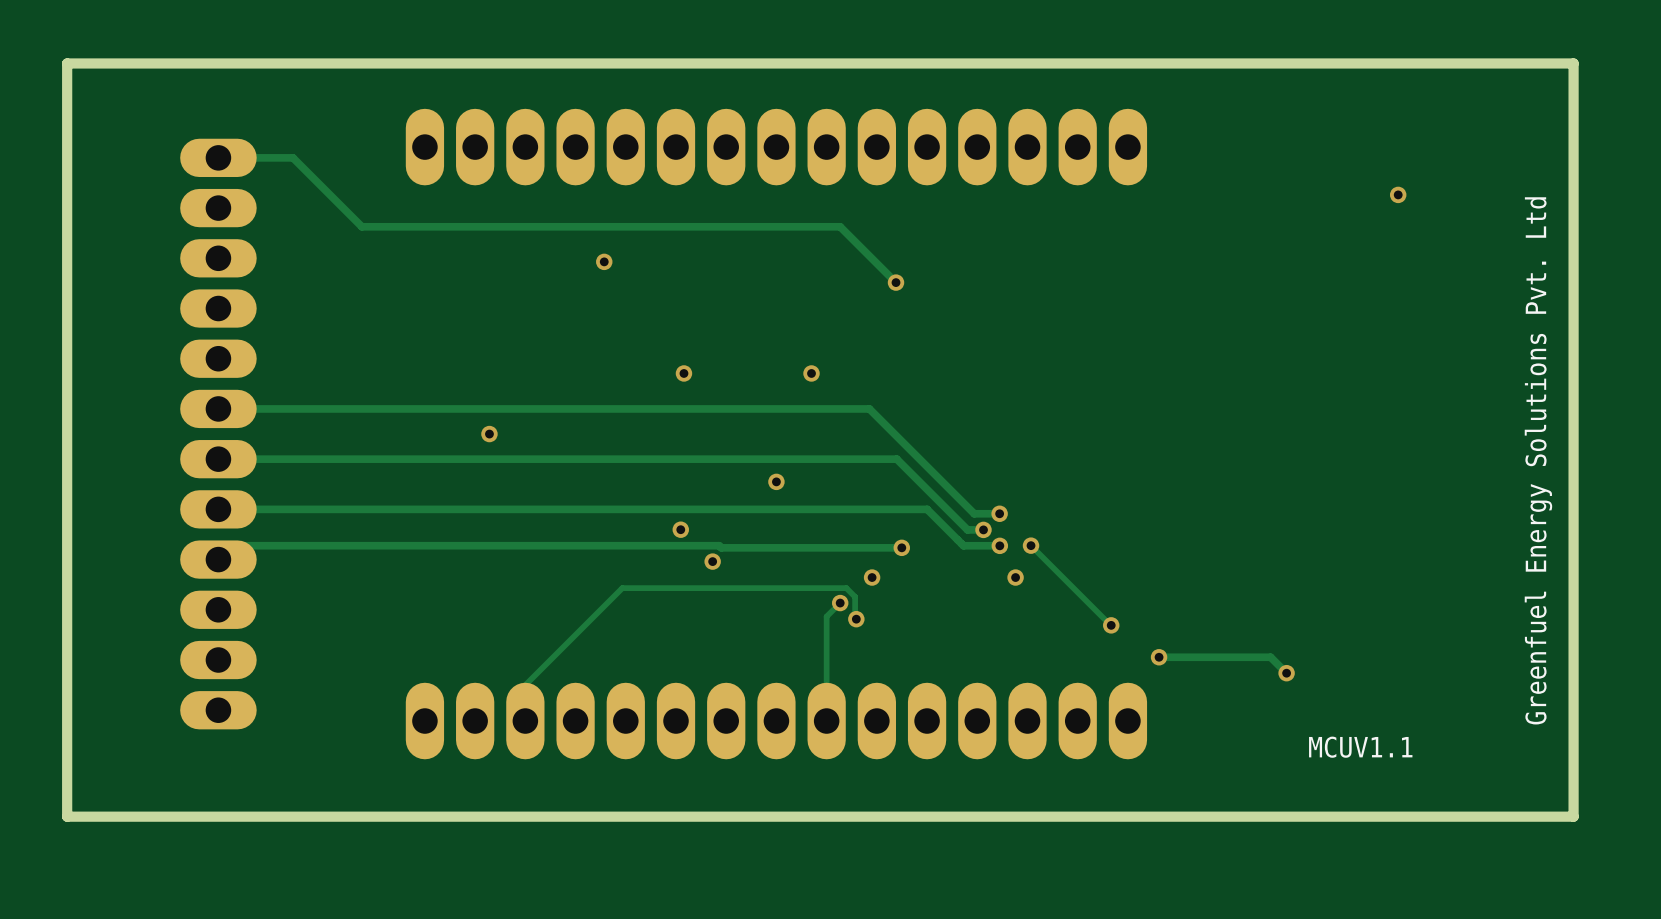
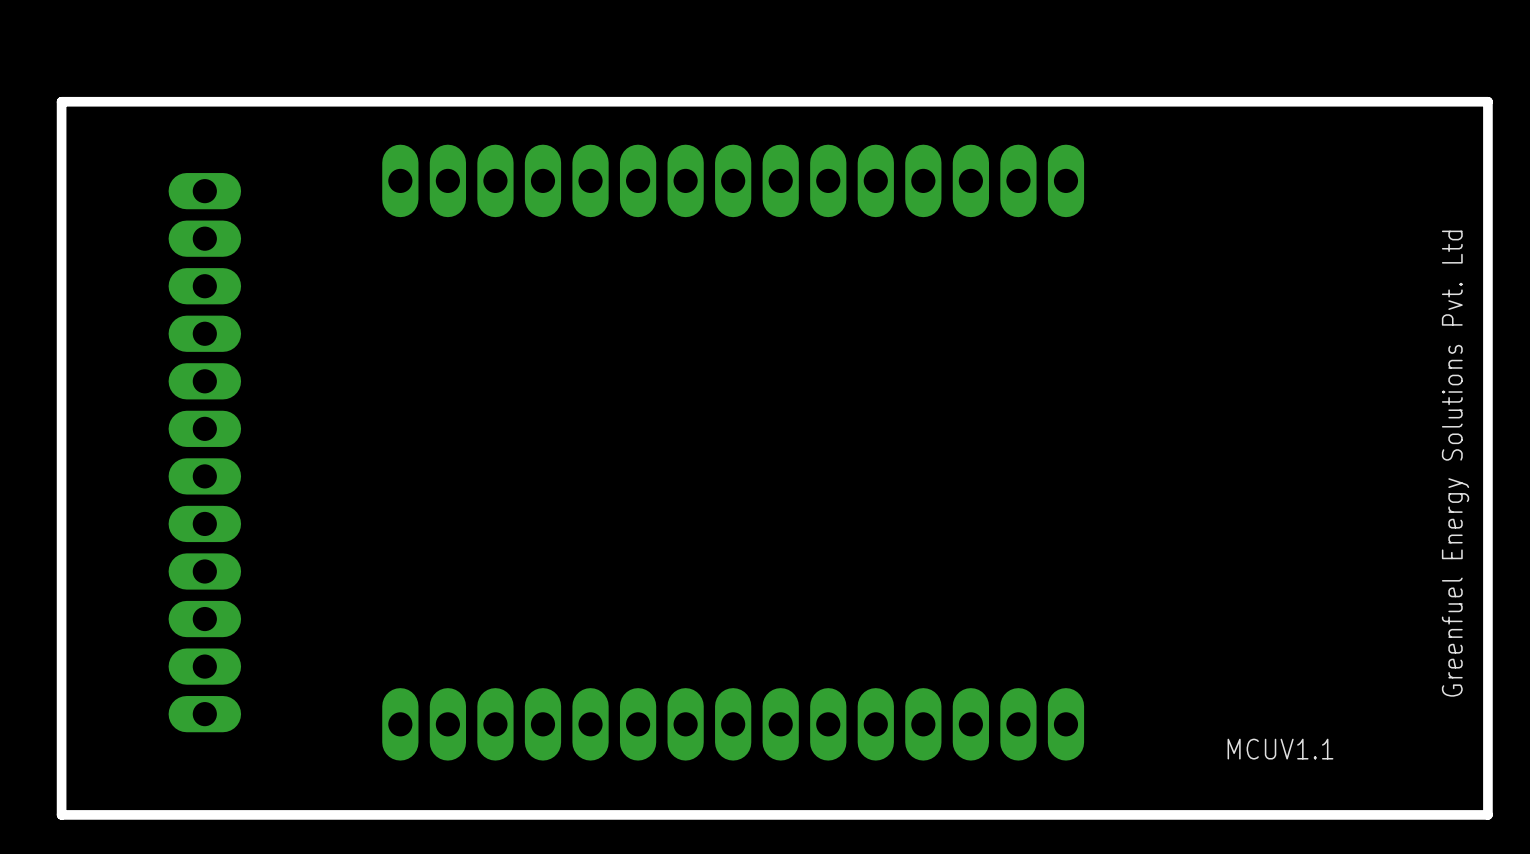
track: (218, 157) (293, 157) (361, 226) (840, 226) (896, 282) -> none
via: (1398, 194) -> none
via: (604, 261) -> none
via: (896, 282) -> none
via: (683, 373) -> none
via: (811, 373) -> none
track: (218, 408) (869, 408) (974, 513) (999, 513) -> none
via: (489, 434) -> none
track: (218, 459) (896, 459) (967, 529) (983, 529) -> none
via: (776, 481) -> none
track: (218, 509) (927, 509) (963, 545) (999, 545) -> none
via: (999, 513) -> none
via: (680, 529) -> none
via: (983, 529) -> none
via: (999, 545) -> none
track: (1031, 545) (1110, 625) -> none
via: (1031, 545) -> none
track: (901, 547) (721, 547) (719, 545) (232, 545) (218, 559) -> none
via: (901, 547) -> none
via: (712, 561) -> none
via: (872, 577) -> none
via: (1015, 577) -> none
track: (840, 603) (826, 616) (826, 721) -> none
via: (840, 603) -> none
track: (856, 619) (855, 596) (846, 588) (622, 588) (525, 685) (525, 721) -> none
via: (856, 619) -> none
via: (1111, 625) -> none
track: (1159, 657) (1270, 657) (1286, 673) -> none
via: (1159, 657) -> none
via: (1286, 673) -> none

